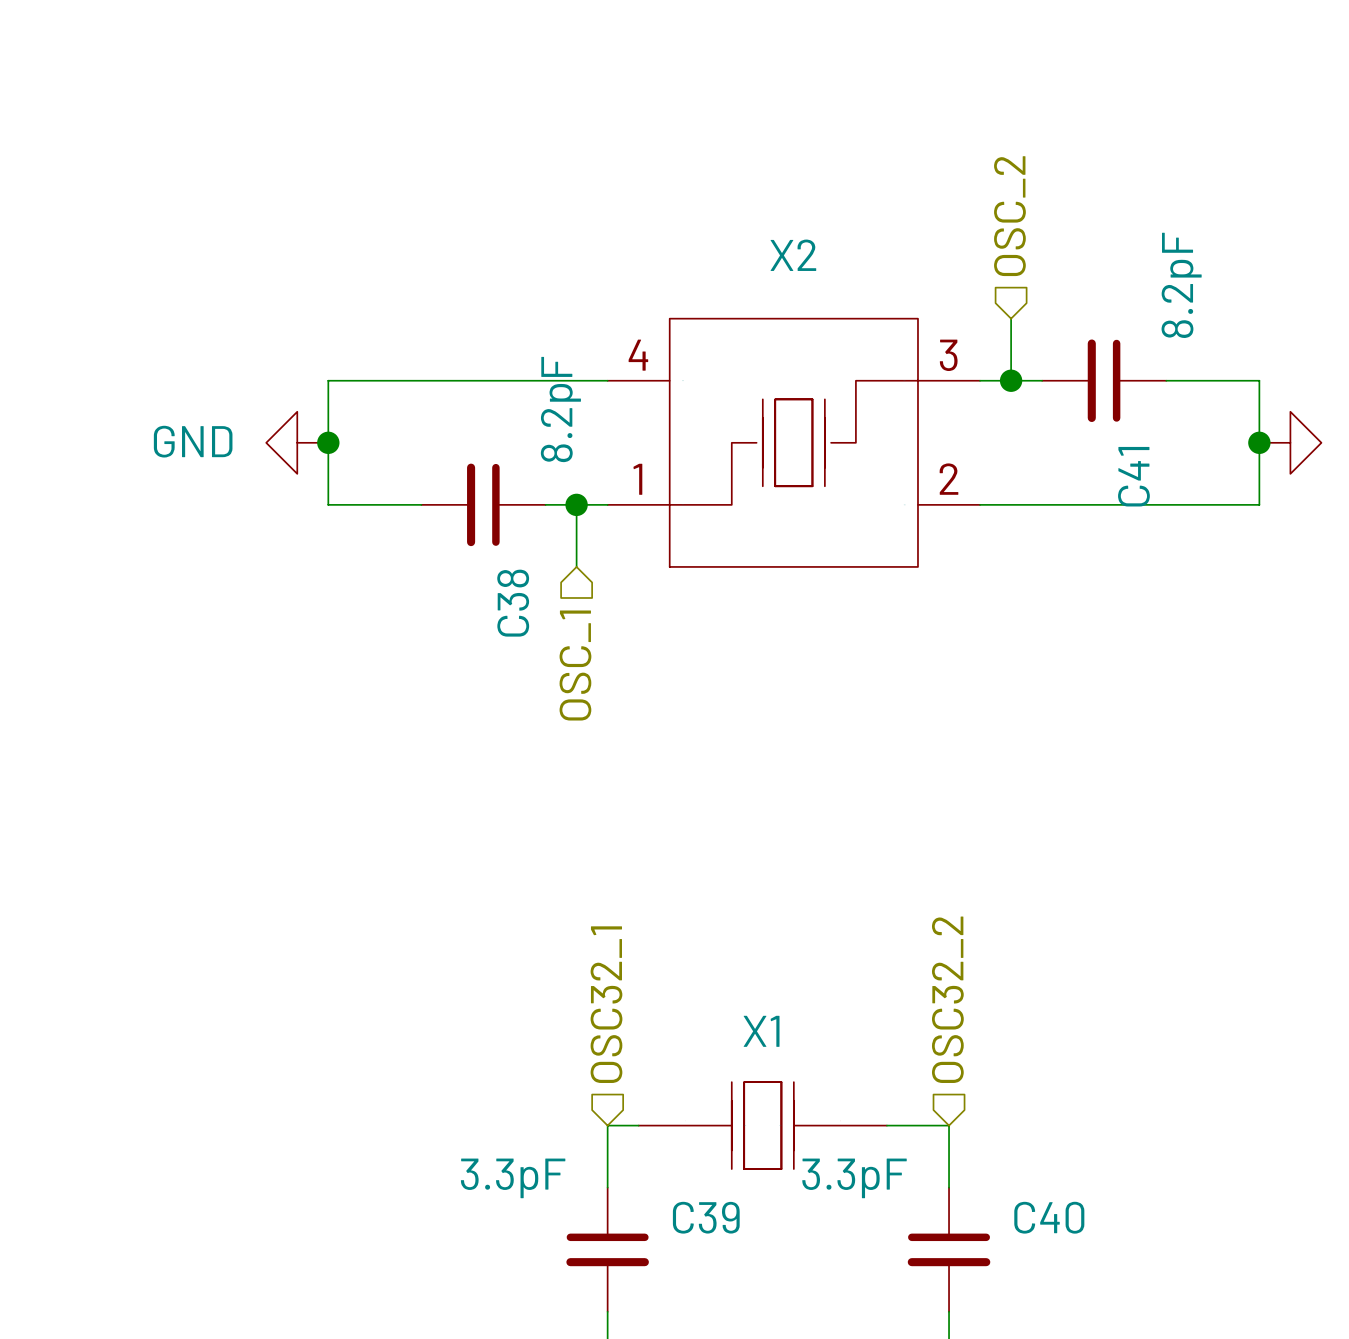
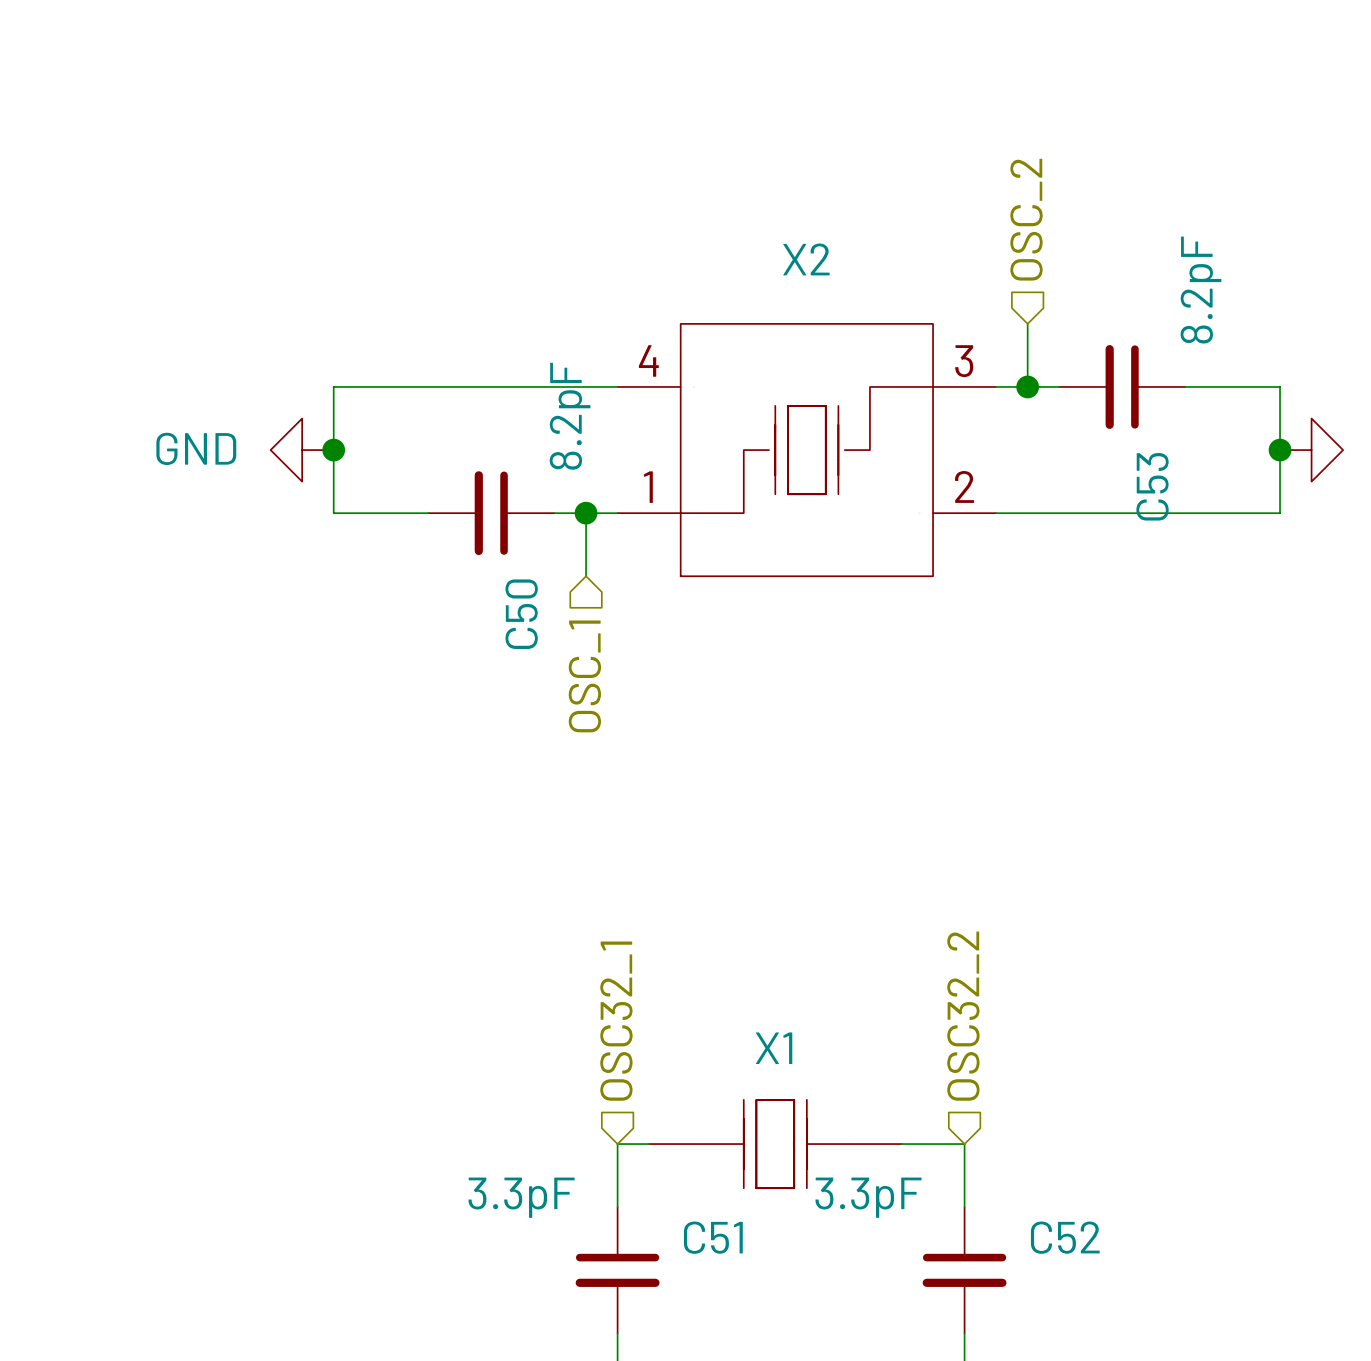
C41 name: C41 (1133, 476) -> C53 (1152, 486)
C38 name: C38 (513, 603) -> C50 (521, 614)
C39 name: C39 (706, 1217) -> C51 (713, 1237)
C40 name: C40 (1049, 1217) -> C52 (1065, 1237)

